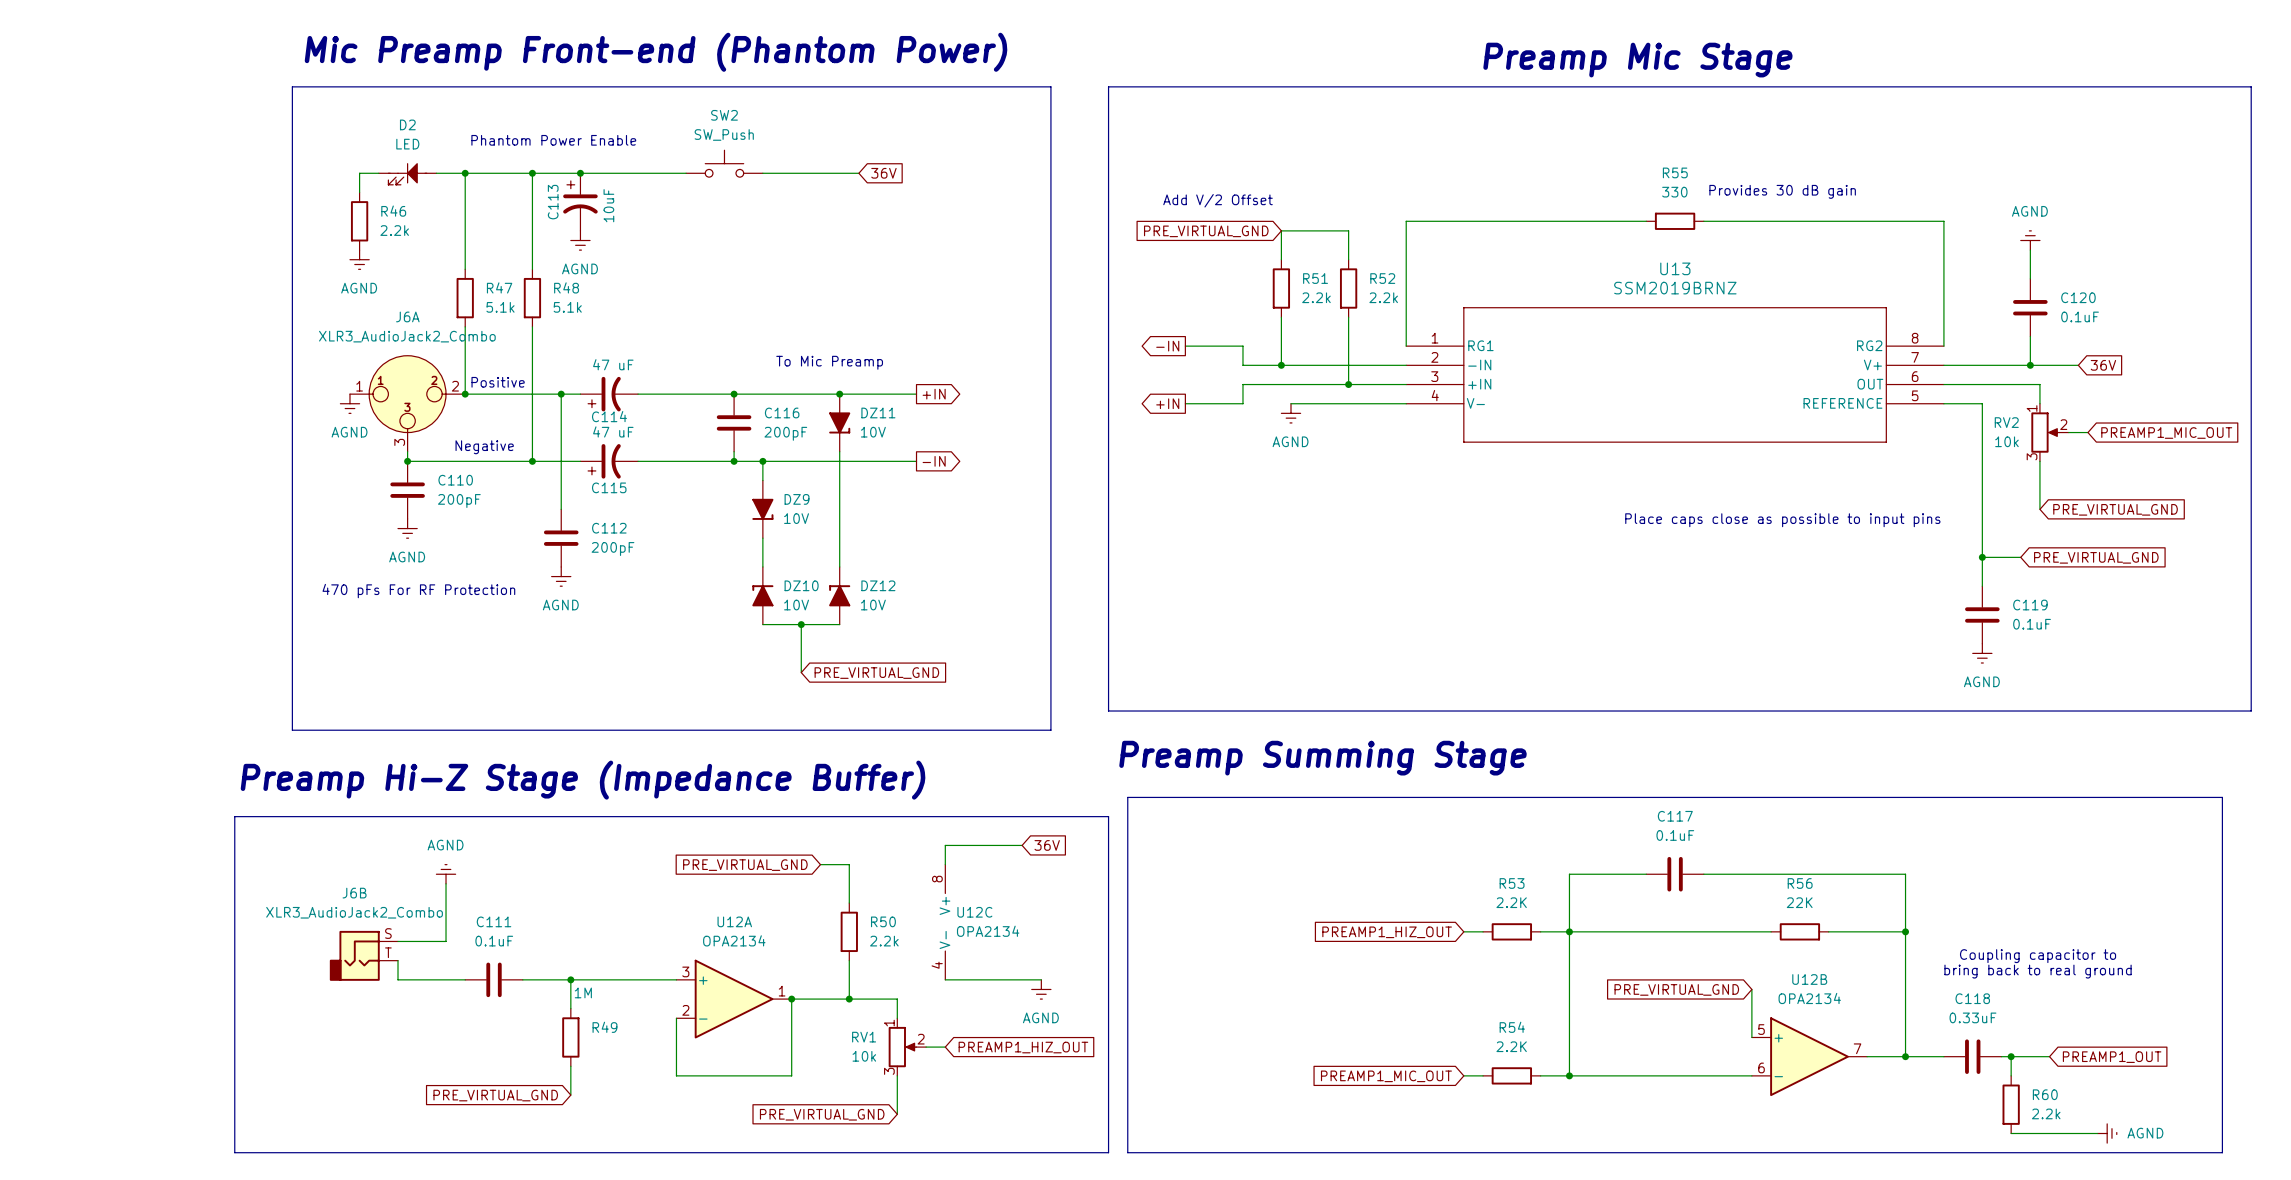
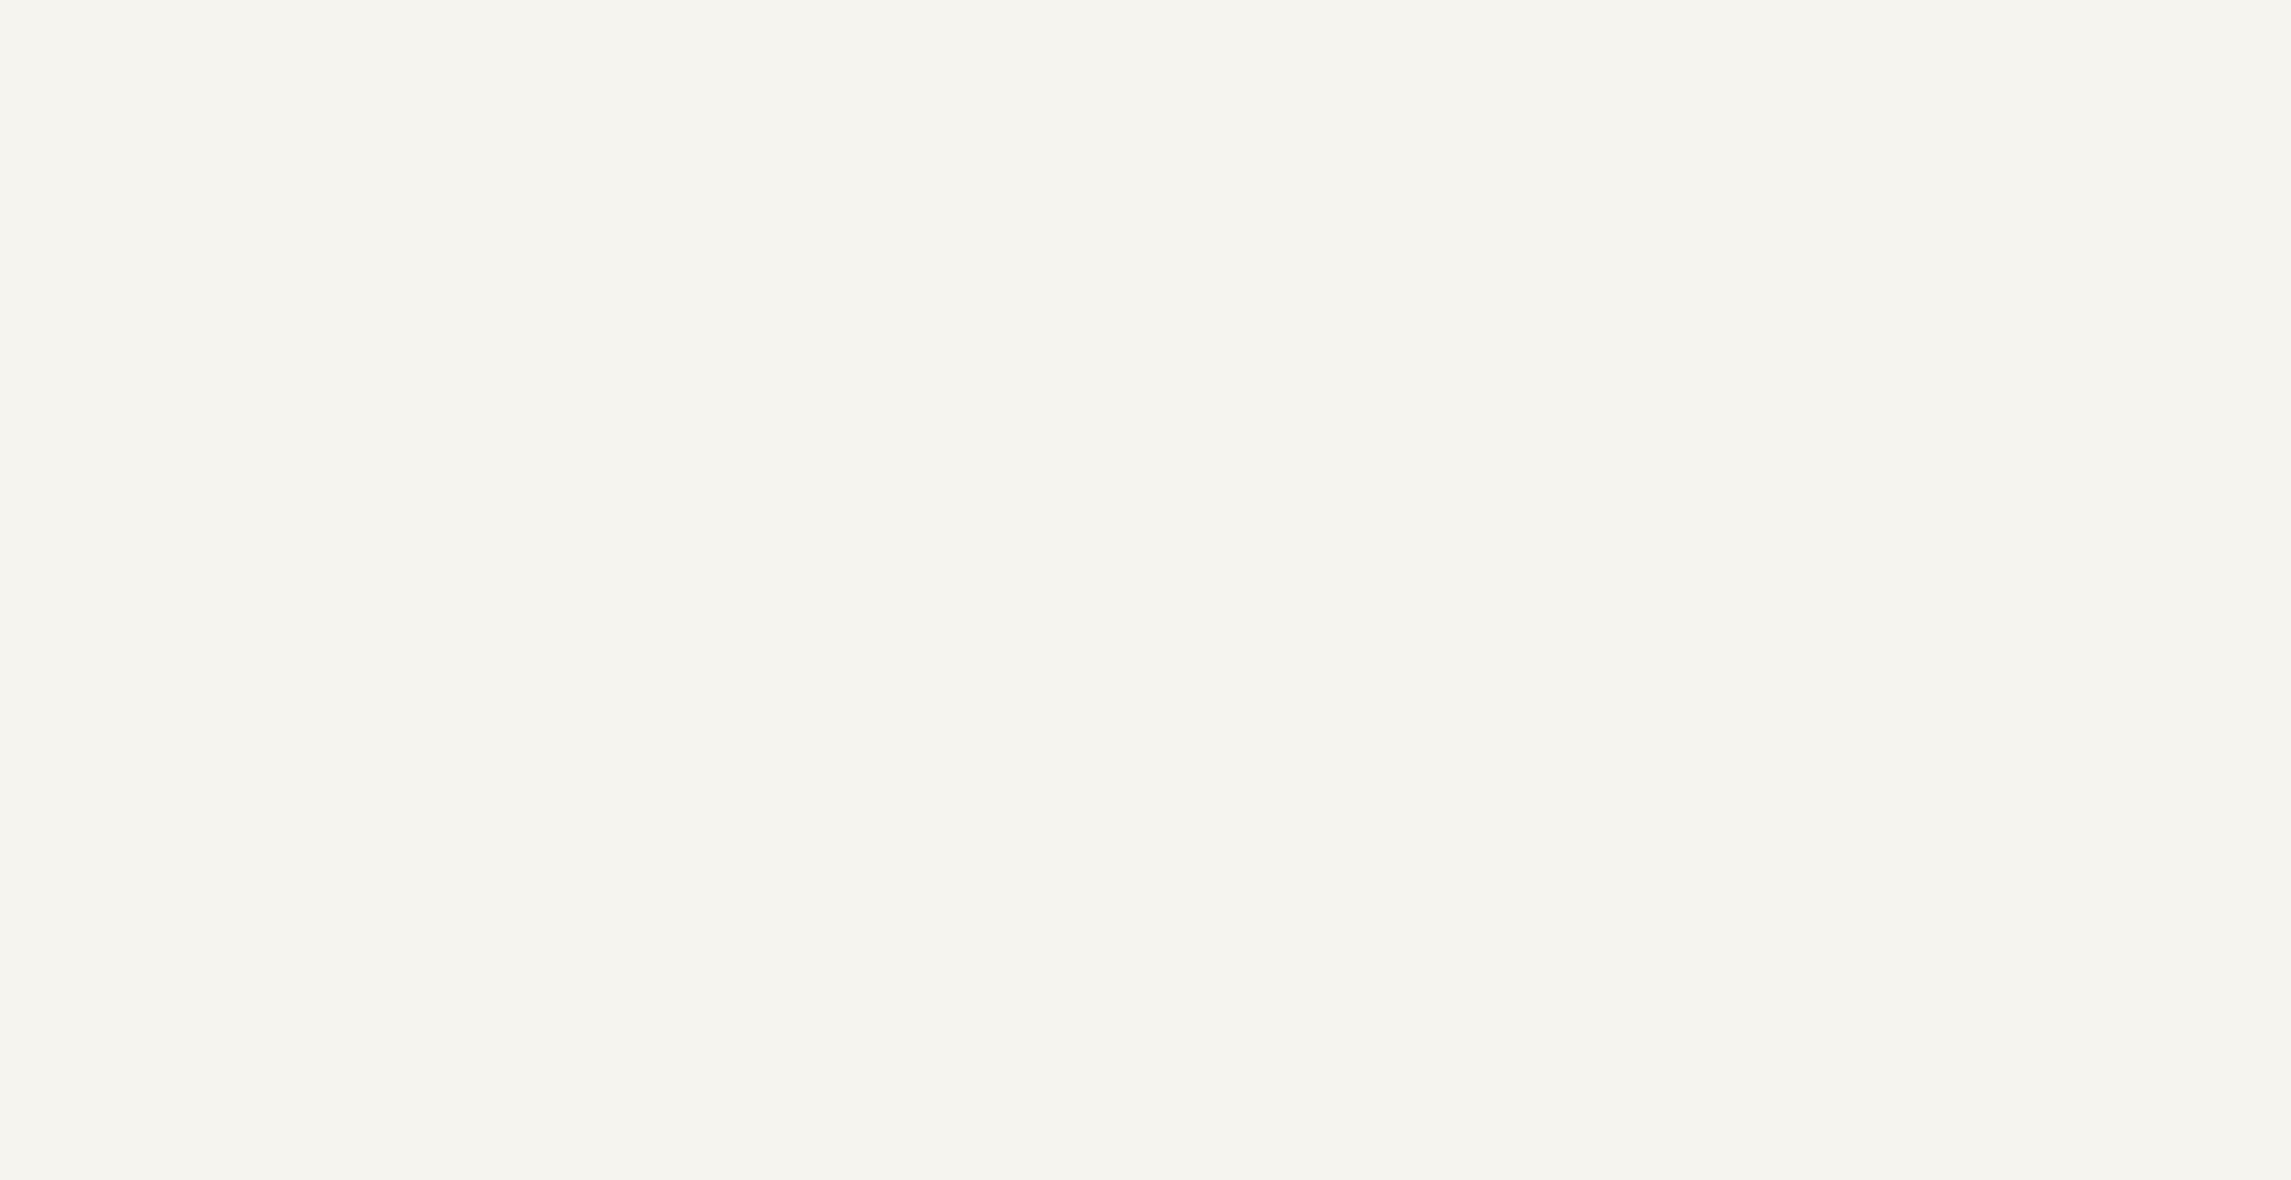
text: Mic Preamp Front-end (Phantom Power) (656, 52) -> none
text: Preamp Mic Stage (1637, 60) -> none
line: (292, 86) (1050, 86) (1050, 730) (292, 730) (292, 86) -> none
line: (1108, 86) (2251, 86) (2251, 711) (1108, 711) (1108, 86) -> none
text: Phantom Power Enable (553, 140) -> none
SW2: SW_Push (724, 163) -> none
wire: (378, 173) (359, 173) (359, 192) -> none
wire: (436, 173) (686, 173) -> none
wire: (465, 173) (465, 269) -> none
junction: (465, 173) -> none
wire: (532, 173) (532, 269) -> none
junction: (532, 173) -> none
junction: (580, 173) -> none
wire: (762, 173) (858, 173) -> none
global label: 36V (883, 173) -> none
D2: LED (407, 174) -> none
text: Provides 30 dB gain (1782, 191) -> none
text: Add V/2 Offset (1218, 200) -> none
C113: 10uF (580, 202) -> none
R46: 2.2k (359, 221) -> none
wire: (1646, 221) (1406, 221) (1406, 346) -> none
R55: 330 (1675, 221) -> none
wire: (1703, 221) (1943, 221) (1943, 346) -> none
global label: PRE_VIRTUAL_GND (1206, 231) -> none
power symbol: AGND (580, 240) -> none
power symbol: AGND (2030, 240) -> none
wire: (2030, 250) (2030, 278) -> none
power symbol: AGND (359, 259) -> none
wire: (1281, 259) (1281, 230) (1348, 230) (1348, 259) -> none
R51: 2.2k (1281, 288) -> none
R52: 2.2k (1348, 288) -> none
R47: 5.1k (465, 298) -> none
R48: 5.1k (532, 298) -> none
C120: 0.1uF (2030, 307) -> none
wire: (1281, 317) (1281, 365) -> none
wire: (1348, 317) (1348, 384) -> none
wire: (465, 326) (465, 394) (580, 394) -> none
wire: (532, 326) (532, 461) -> none
wire: (2030, 336) (2030, 365) -> none
global label: -IN (1167, 346) -> none
wire: (1185, 346) (1242, 346) (1242, 365) (1406, 365) -> none
text: To Mic Preamp (829, 362) -> none
junction: (1281, 365) -> none
wire: (1943, 365) (2078, 365) -> none
junction: (2030, 365) -> none
global label: 36V (2103, 365) -> none
U13: SSM2019BRNZ (1675, 374) -> none
text: Positive (498, 382) -> none
junction: (1348, 384) -> none
wire: (1406, 384) (1242, 384) (1242, 403) (1185, 403) -> none
wire: (1943, 384) (2039, 384) (2039, 403) -> none
junction: (465, 394) -> none
wire: (561, 394) (561, 509) -> none
junction: (561, 394) -> none
C114: 47 uF (609, 394) -> none
wire: (638, 394) (916, 394) -> none
junction: (734, 394) -> none
junction: (839, 394) -> none
global label: +IN (934, 394) -> none
power symbol: AGND (349, 403) -> none
J6A: XLR3_AudioJack2_Combo (407, 403) -> none
global label: +IN (1167, 403) -> none
wire: (1290, 403) (1406, 403) -> none
wire: (1943, 403) (1982, 403) (1982, 586) -> none
power symbol: AGND (1290, 413) -> none
C116: 200pF (734, 422) -> none
DZ11: 10V (839, 422) -> none
RV2: 10k (2050, 432) -> none
wire: (2068, 432) (2087, 432) -> none
global label: PREAMP1_MIC_OUT (2166, 433) -> none
text: Negative (484, 447) -> none
wire: (407, 451) (407, 461) (580, 461) -> none
wire: (734, 451) (734, 461) -> none
wire: (839, 451) (839, 566) -> none
junction: (407, 461) -> none
junction: (532, 461) -> none
C115: 47 uF (609, 461) -> none
wire: (638, 461) (916, 461) -> none
junction: (734, 461) -> none
wire: (762, 461) (762, 480) -> none
junction: (762, 461) -> none
global label: -IN (934, 461) -> none
wire: (2039, 461) (2039, 509) -> none
C110: 200pF (407, 490) -> none
DZ9: 10V (762, 509) -> none
global label: PRE_VIRTUAL_GND (2115, 509) -> none
text: Place caps close as possible to input pins (1782, 520) -> none
power symbol: AGND (407, 528) -> none
C112: 200pF (561, 538) -> none
wire: (762, 538) (762, 566) -> none
wire: (1982, 557) (2020, 557) -> none
junction: (1982, 557) -> none
global label: PRE_VIRTUAL_GND (2096, 557) -> none
power symbol: AGND (561, 576) -> none
text: 470 pFs For RF Protection (418, 591) -> none
DZ10: 10V (762, 595) -> none
DZ12: 10V (839, 595) -> none
C119: 0.1uF (1982, 614) -> none
wire: (762, 624) (839, 624) -> none
wire: (801, 624) (801, 672) -> none
junction: (801, 624) -> none
power symbol: AGND (1982, 653) -> none
global label: PRE_VIRTUAL_GND (876, 673) -> none
text: Preamp Summing Stage (1323, 758) -> none
text: Preamp Hi-Z Stage (Impedance Buffer) (583, 780) -> none
line: (1127, 797) (2222, 797) (2222, 1152) (1127, 1152) (1127, 797) -> none
line: (234, 816) (1108, 816) (1108, 1152) (234, 1152) (234, 816) -> none
wire: (1022, 845) (945, 845) (945, 864) -> none
global label: 36V (1047, 845) -> none
wire: (820, 864) (849, 864) (849, 903) -> none
global label: PRE_VIRTUAL_GND (745, 865) -> none
power symbol: AGND (446, 874) -> none
wire: (1646, 874) (1569, 874) (1569, 1075) -> none
C117: 0.1uF (1675, 874) -> none
wire: (1703, 874) (1905, 874) (1905, 1056) -> none
wire: (446, 883) (446, 941) (398, 941) -> none
U12C: OPA2134 (945, 922) -> none
R50: 2.2k (849, 931) -> none
wire: (1463, 931) (1483, 931) -> none
R53: 2.2K (1511, 931) -> none
wire: (1540, 931) (1771, 931) -> none
junction: (1569, 931) -> none
R56: 22K (1799, 931) -> none
wire: (1828, 931) (1905, 931) -> none
junction: (1905, 931) -> none
global label: PREAMP1_HIZ_OUT (1387, 932) -> none
J6B: XLR3_AudioJack2_Combo (363, 955) -> none
text: Coupling capacitor to (2038, 956) -> none
wire: (398, 960) (398, 979) (465, 979) -> none
wire: (849, 960) (849, 999) -> none
text: bring back to real ground (2038, 971) -> none
C111: 0.1uF (494, 979) -> none
wire: (522, 979) (676, 979) -> none
wire: (570, 979) (570, 1008) -> none
junction: (570, 979) -> none
wire: (945, 979) (1041, 979) -> none
power symbol: AGND (1041, 989) -> none
global label: PRE_VIRTUAL_GND (1676, 989) -> none
wire: (1751, 989) (1751, 1037) -> none
U12A: OPA2134 (734, 999) -> none
junction: (791, 999) -> none
junction: (849, 999) -> none
wire: (676, 1018) (676, 1075) (791, 1075) (791, 999) (897, 999) (897, 1018) -> none
R49: 1M (570, 1037) -> none
RV1: 10k (907, 1047) -> none
wire: (926, 1047) (945, 1047) -> none
global label: PREAMP1_HIZ_OUT (1023, 1047) -> none
U12B: OPA2134 (1809, 1056) -> none
wire: (1867, 1056) (1943, 1056) -> none
junction: (1905, 1056) -> none
C118: 0.33uF (1972, 1056) -> none
wire: (2001, 1056) (2049, 1056) -> none
wire: (2011, 1056) (2011, 1075) -> none
junction: (2011, 1056) -> none
global label: PREAMP1_OUT (2112, 1057) -> none
wire: (570, 1066) (570, 1095) -> none
wire: (897, 1075) (897, 1114) -> none
wire: (1463, 1075) (1483, 1075) -> none
R54: 2.2K (1511, 1075) -> none
wire: (1540, 1075) (1751, 1075) -> none
junction: (1569, 1075) -> none
global label: PREAMP1_MIC_OUT (1386, 1076) -> none
global label: PRE_VIRTUAL_GND (495, 1095) -> none
R60: 2.2k (2011, 1104) -> none
global label: PRE_VIRTUAL_GND (822, 1114) -> none
wire: (2011, 1133) (2097, 1133) -> none
power symbol: AGND (2107, 1133) -> none

